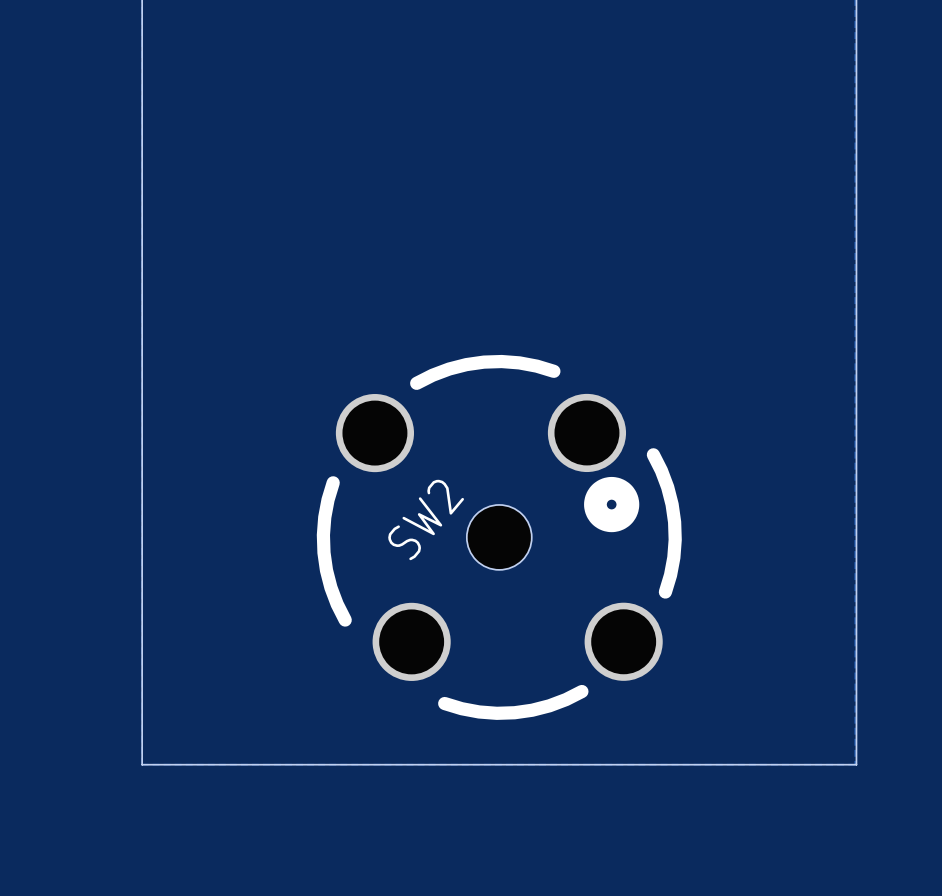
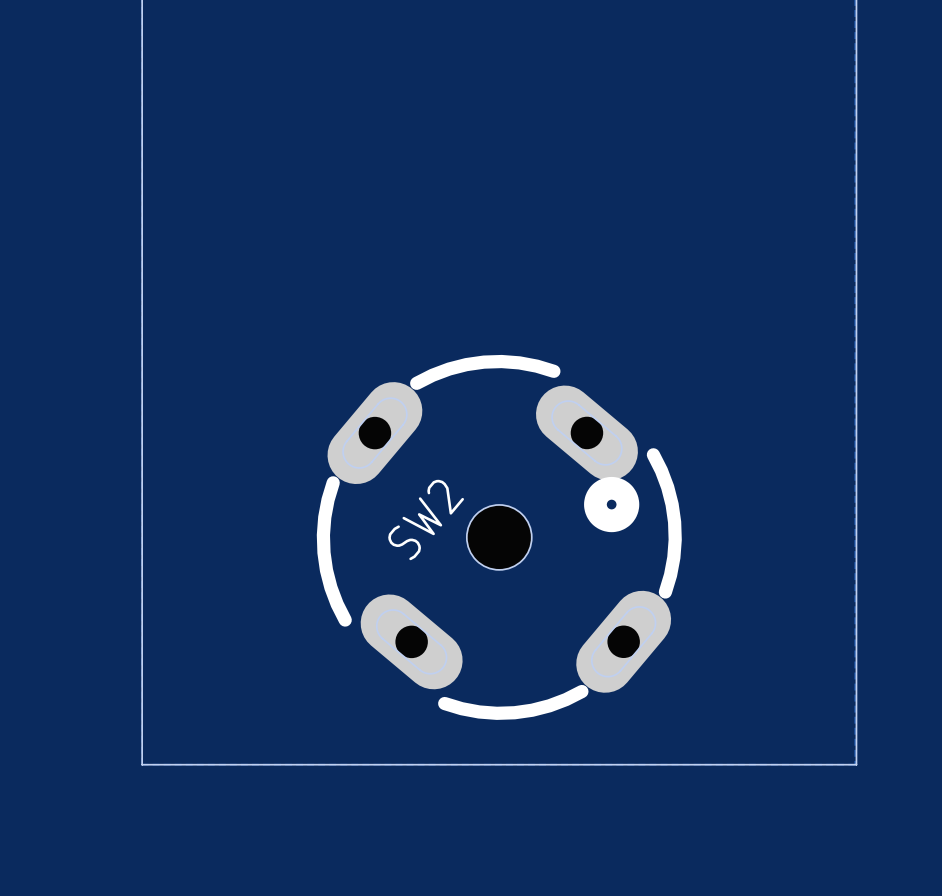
SW2 footprint: [316, 354, 682, 720] -> [316, 354, 682, 720]

